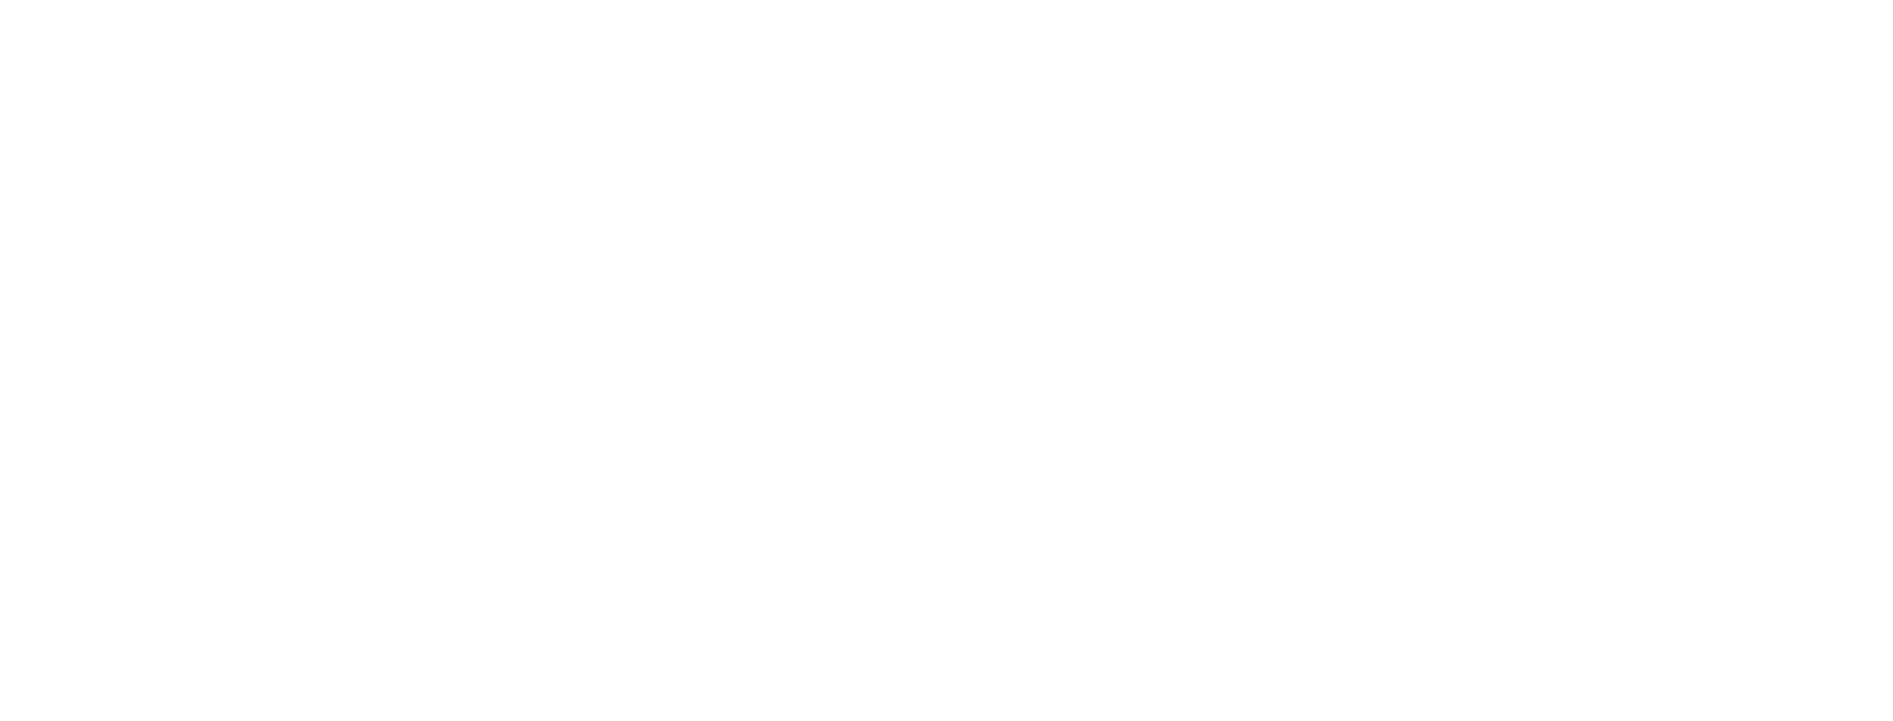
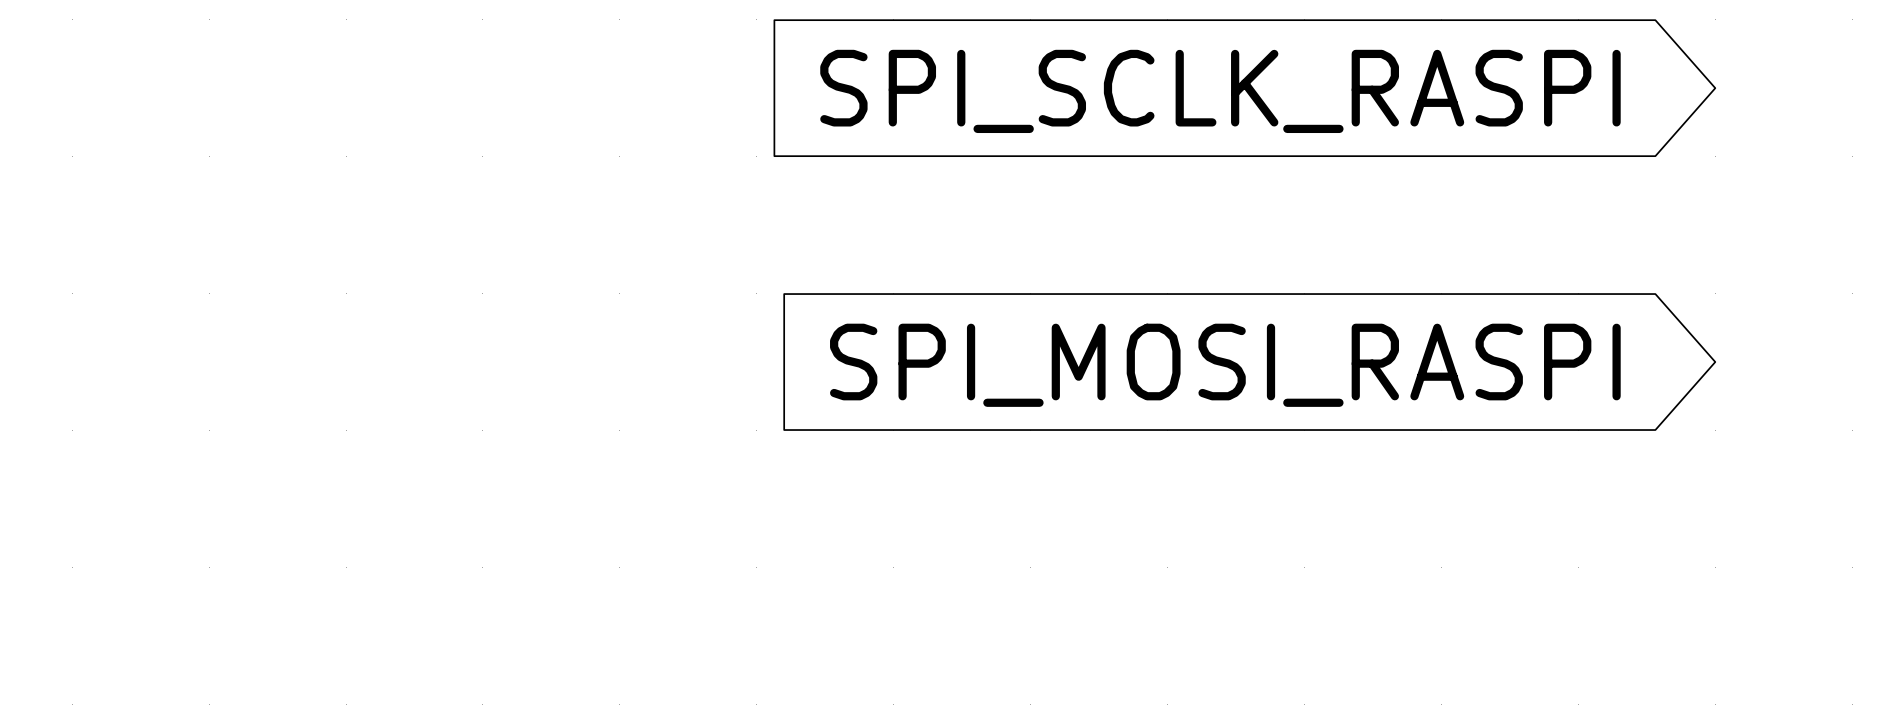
global label: none -> SPI_SCLK_RASPI (1220, 91)
global label: none -> SPI_MOSI_RASPI (1225, 365)

